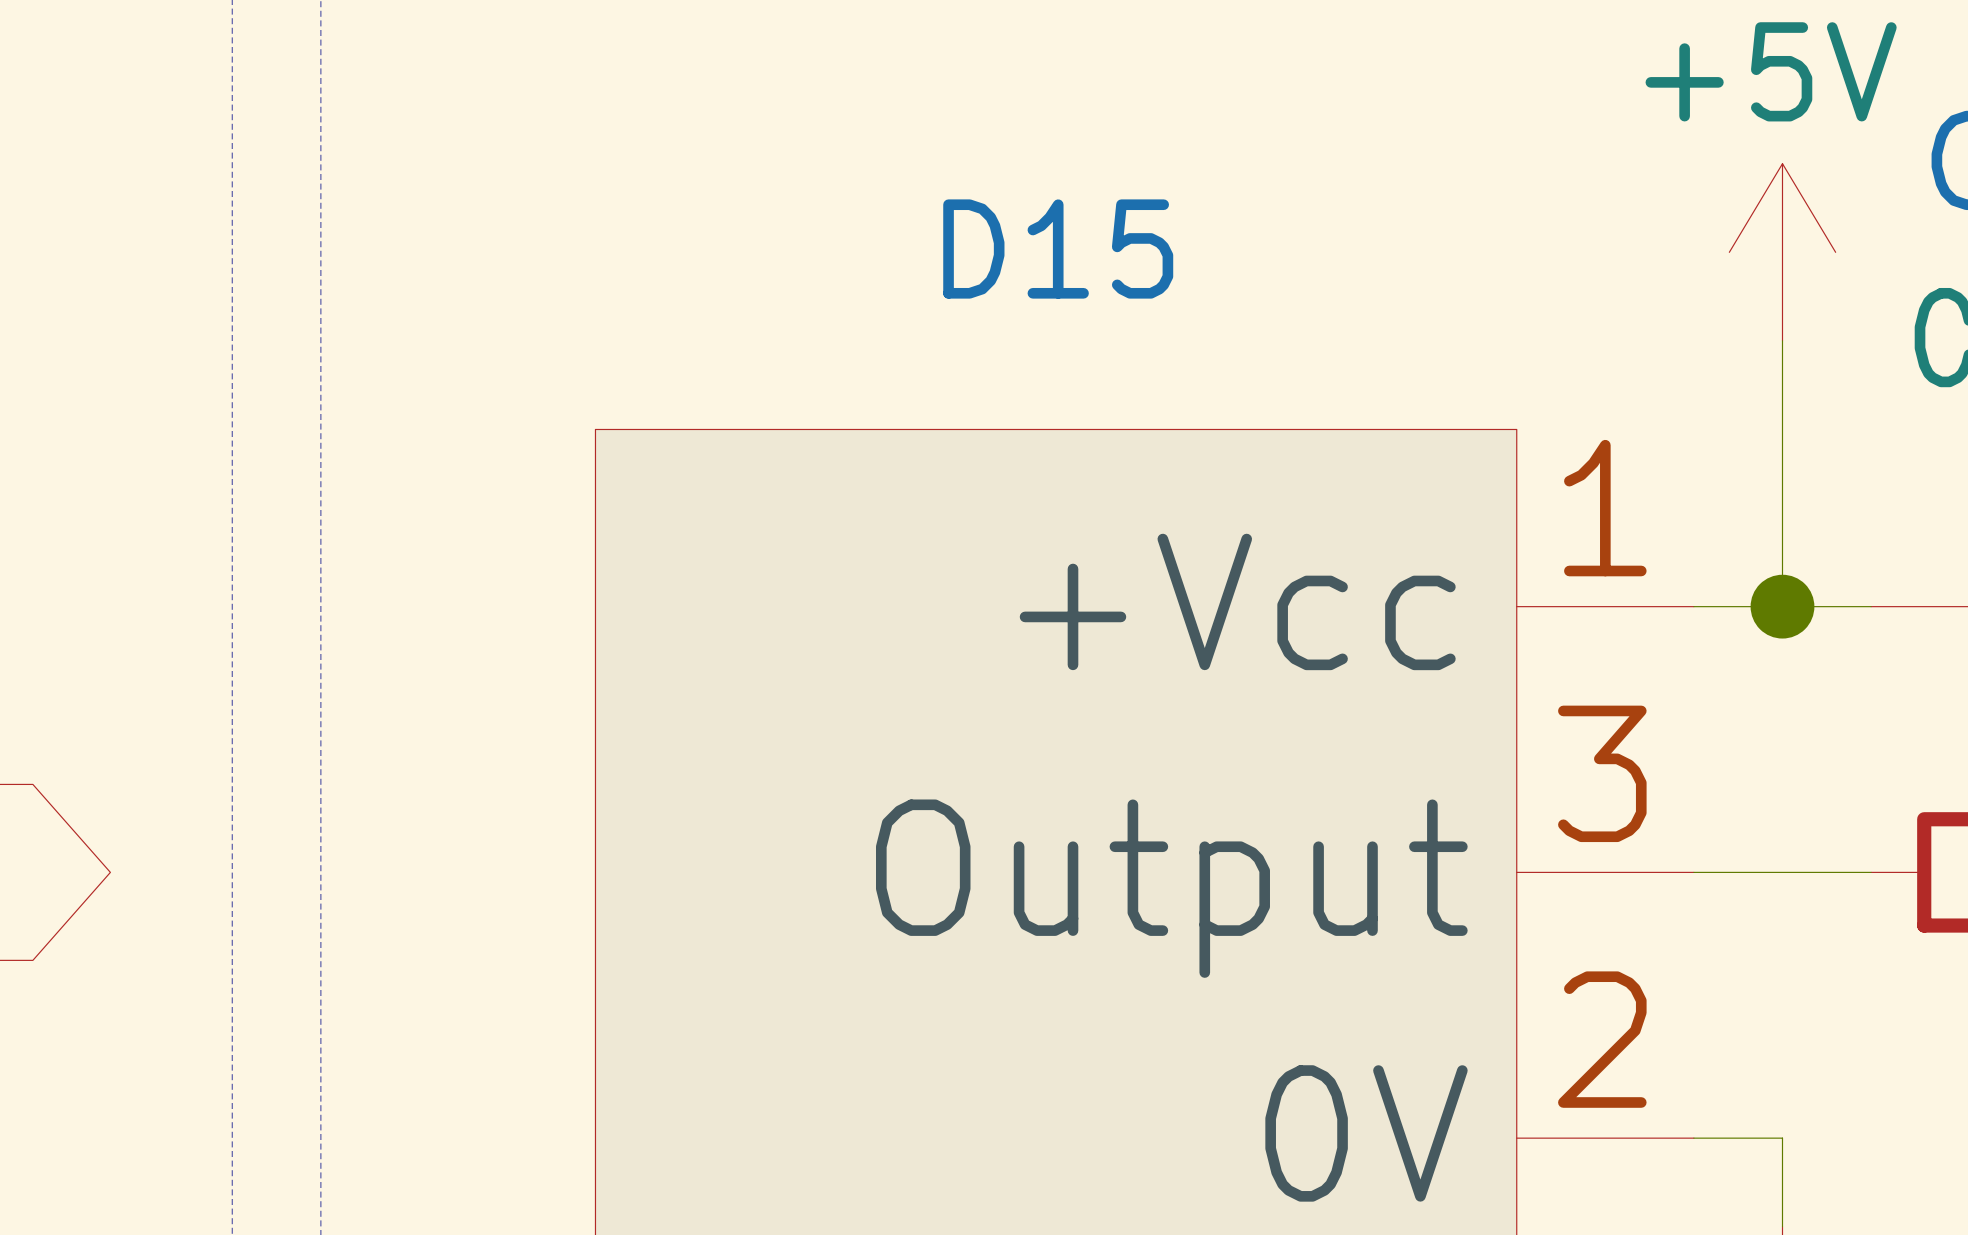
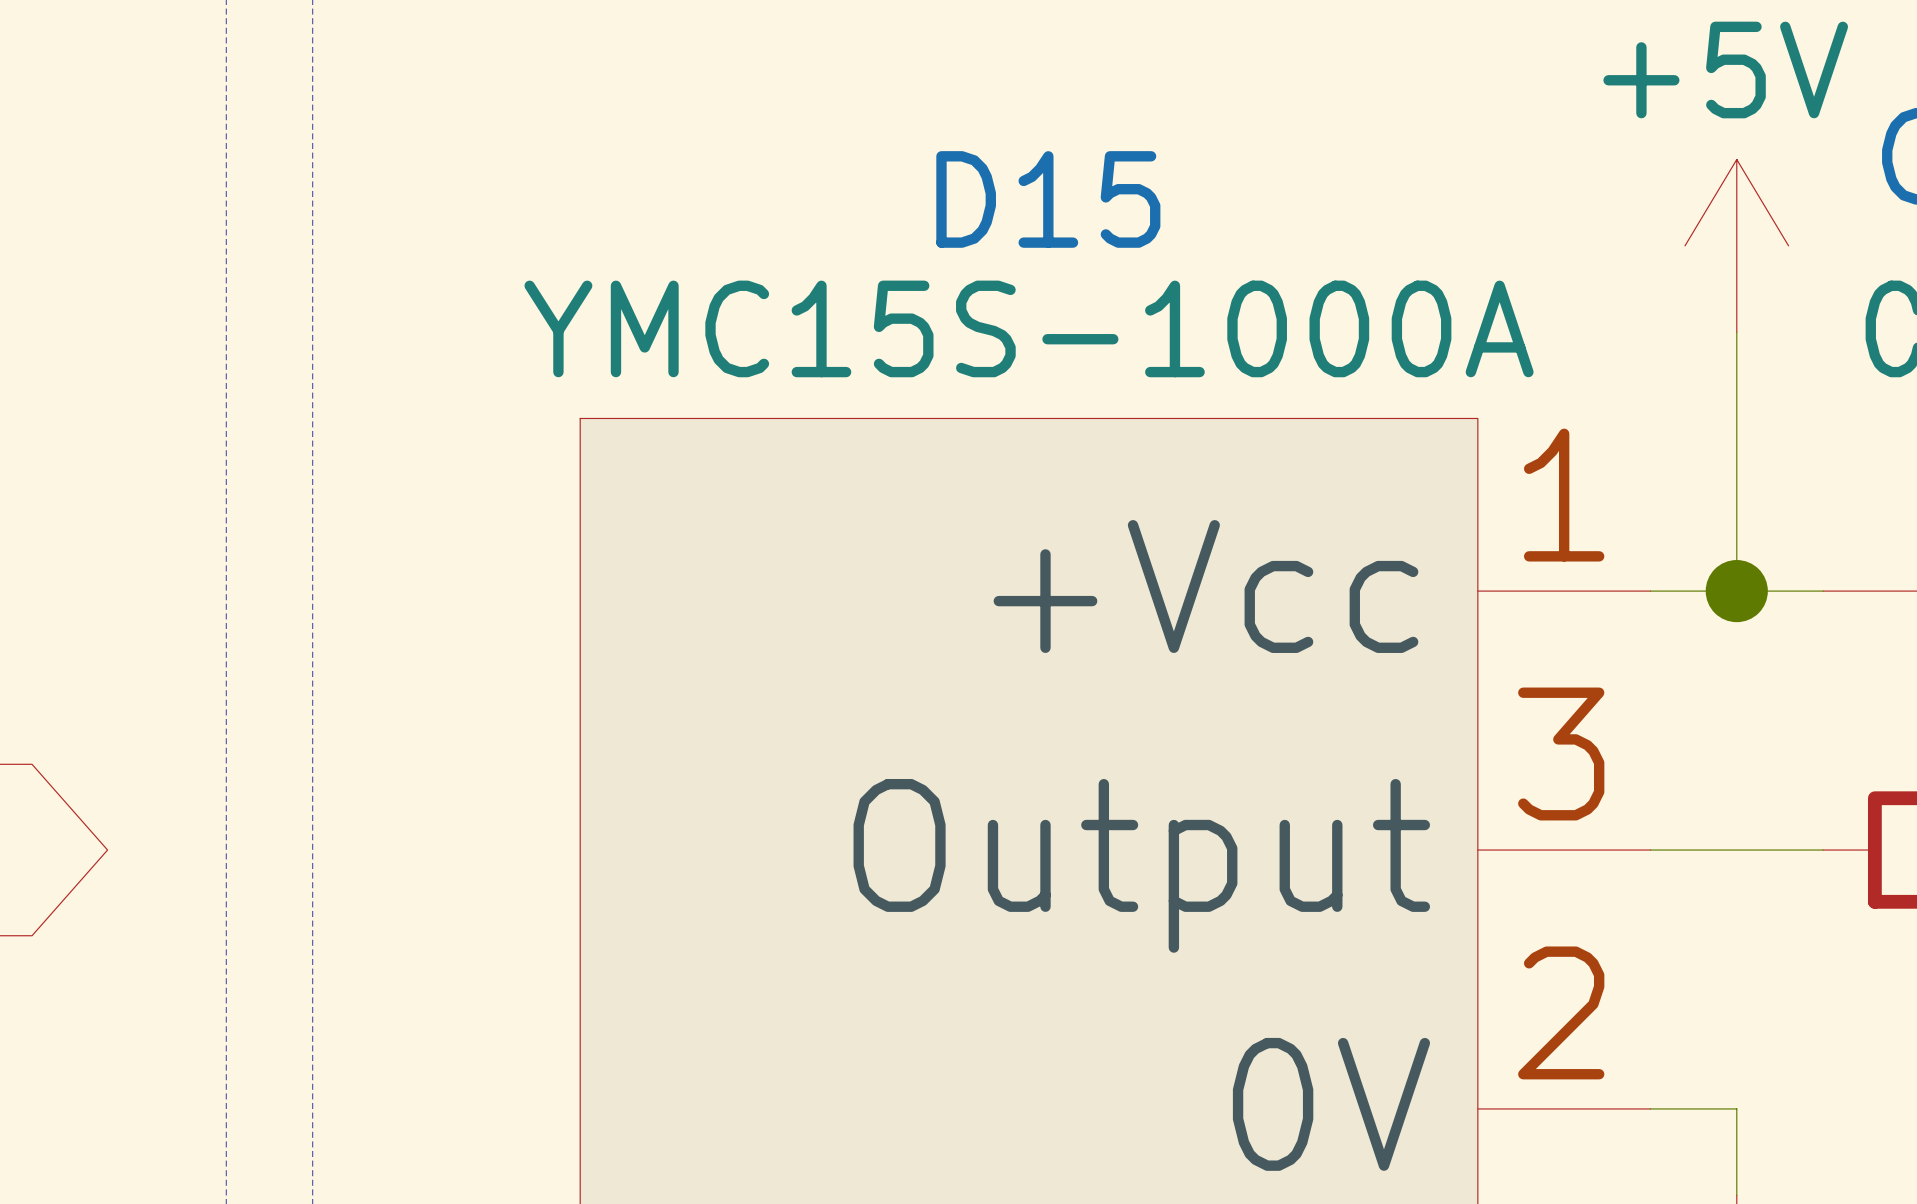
D15 name position: D15 (1058, 249) -> D15 (1048, 199)
D15 value: none -> YMC15S-1000A (1029, 328)

